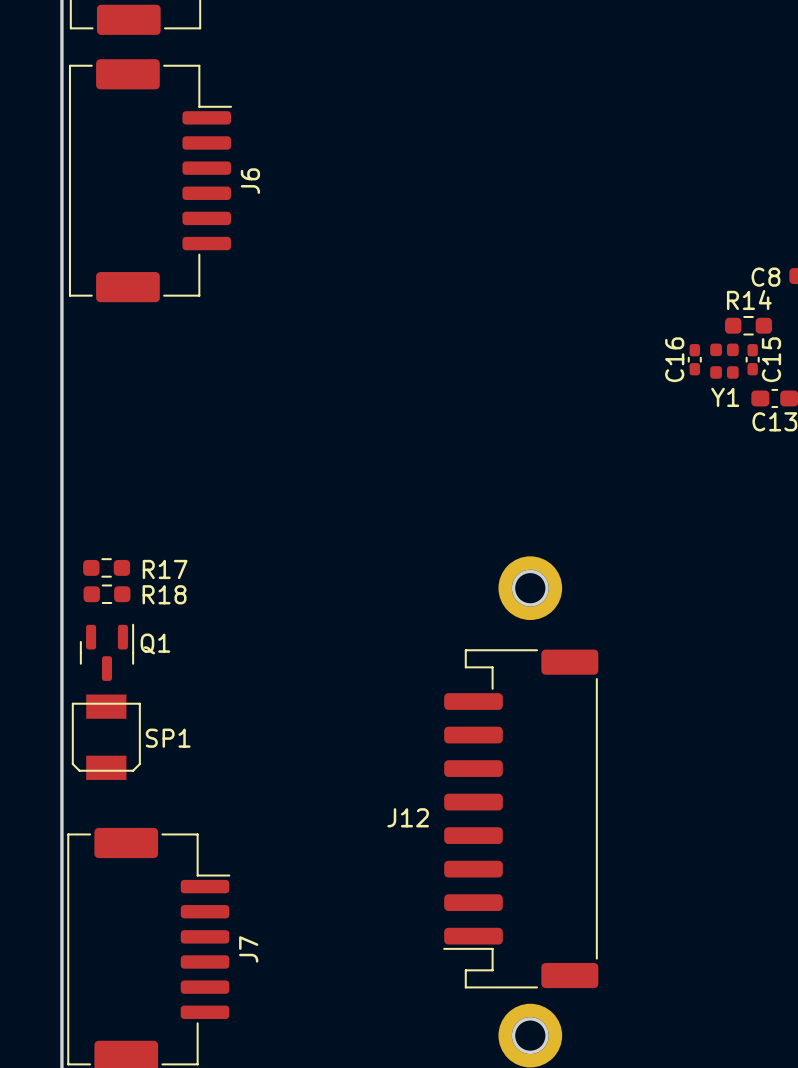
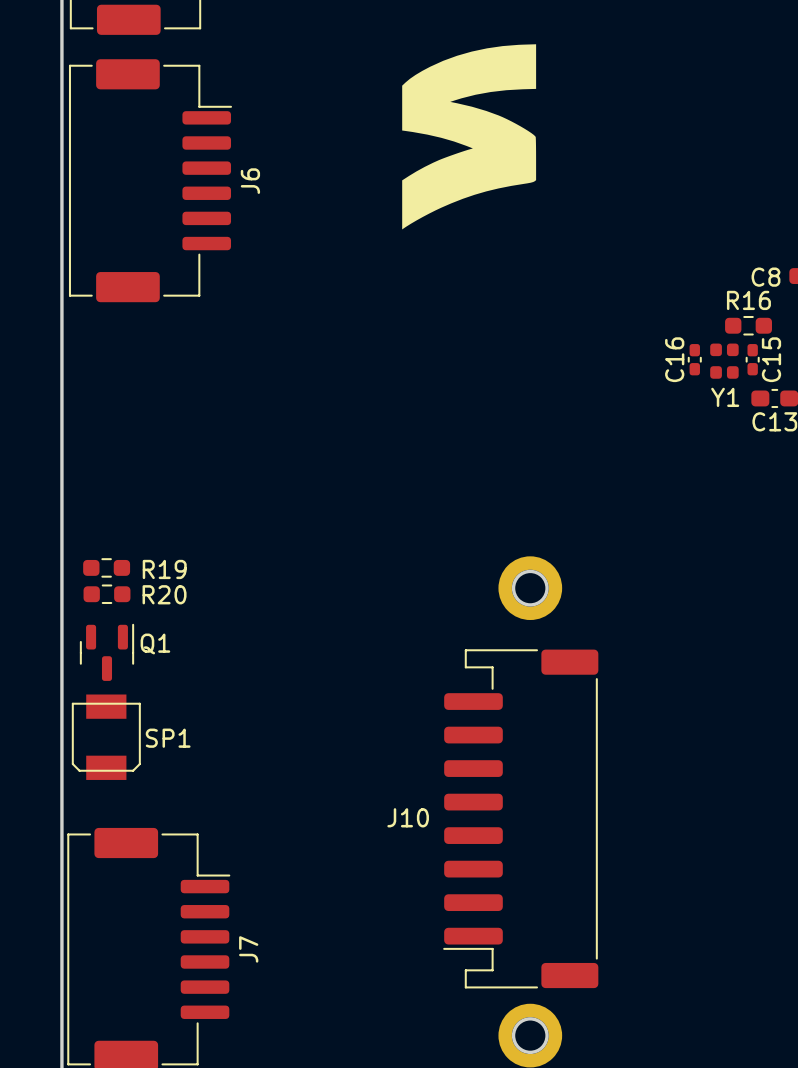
drawing: none -> [402, 44, 537, 230]
R14 name: R14 (749, 300) -> R16 (748, 300)
R17 name: R17 (165, 569) -> R19 (164, 569)
R18 name: R18 (164, 594) -> R20 (164, 594)
J12 name: J12 (408, 817) -> J10 (408, 817)

